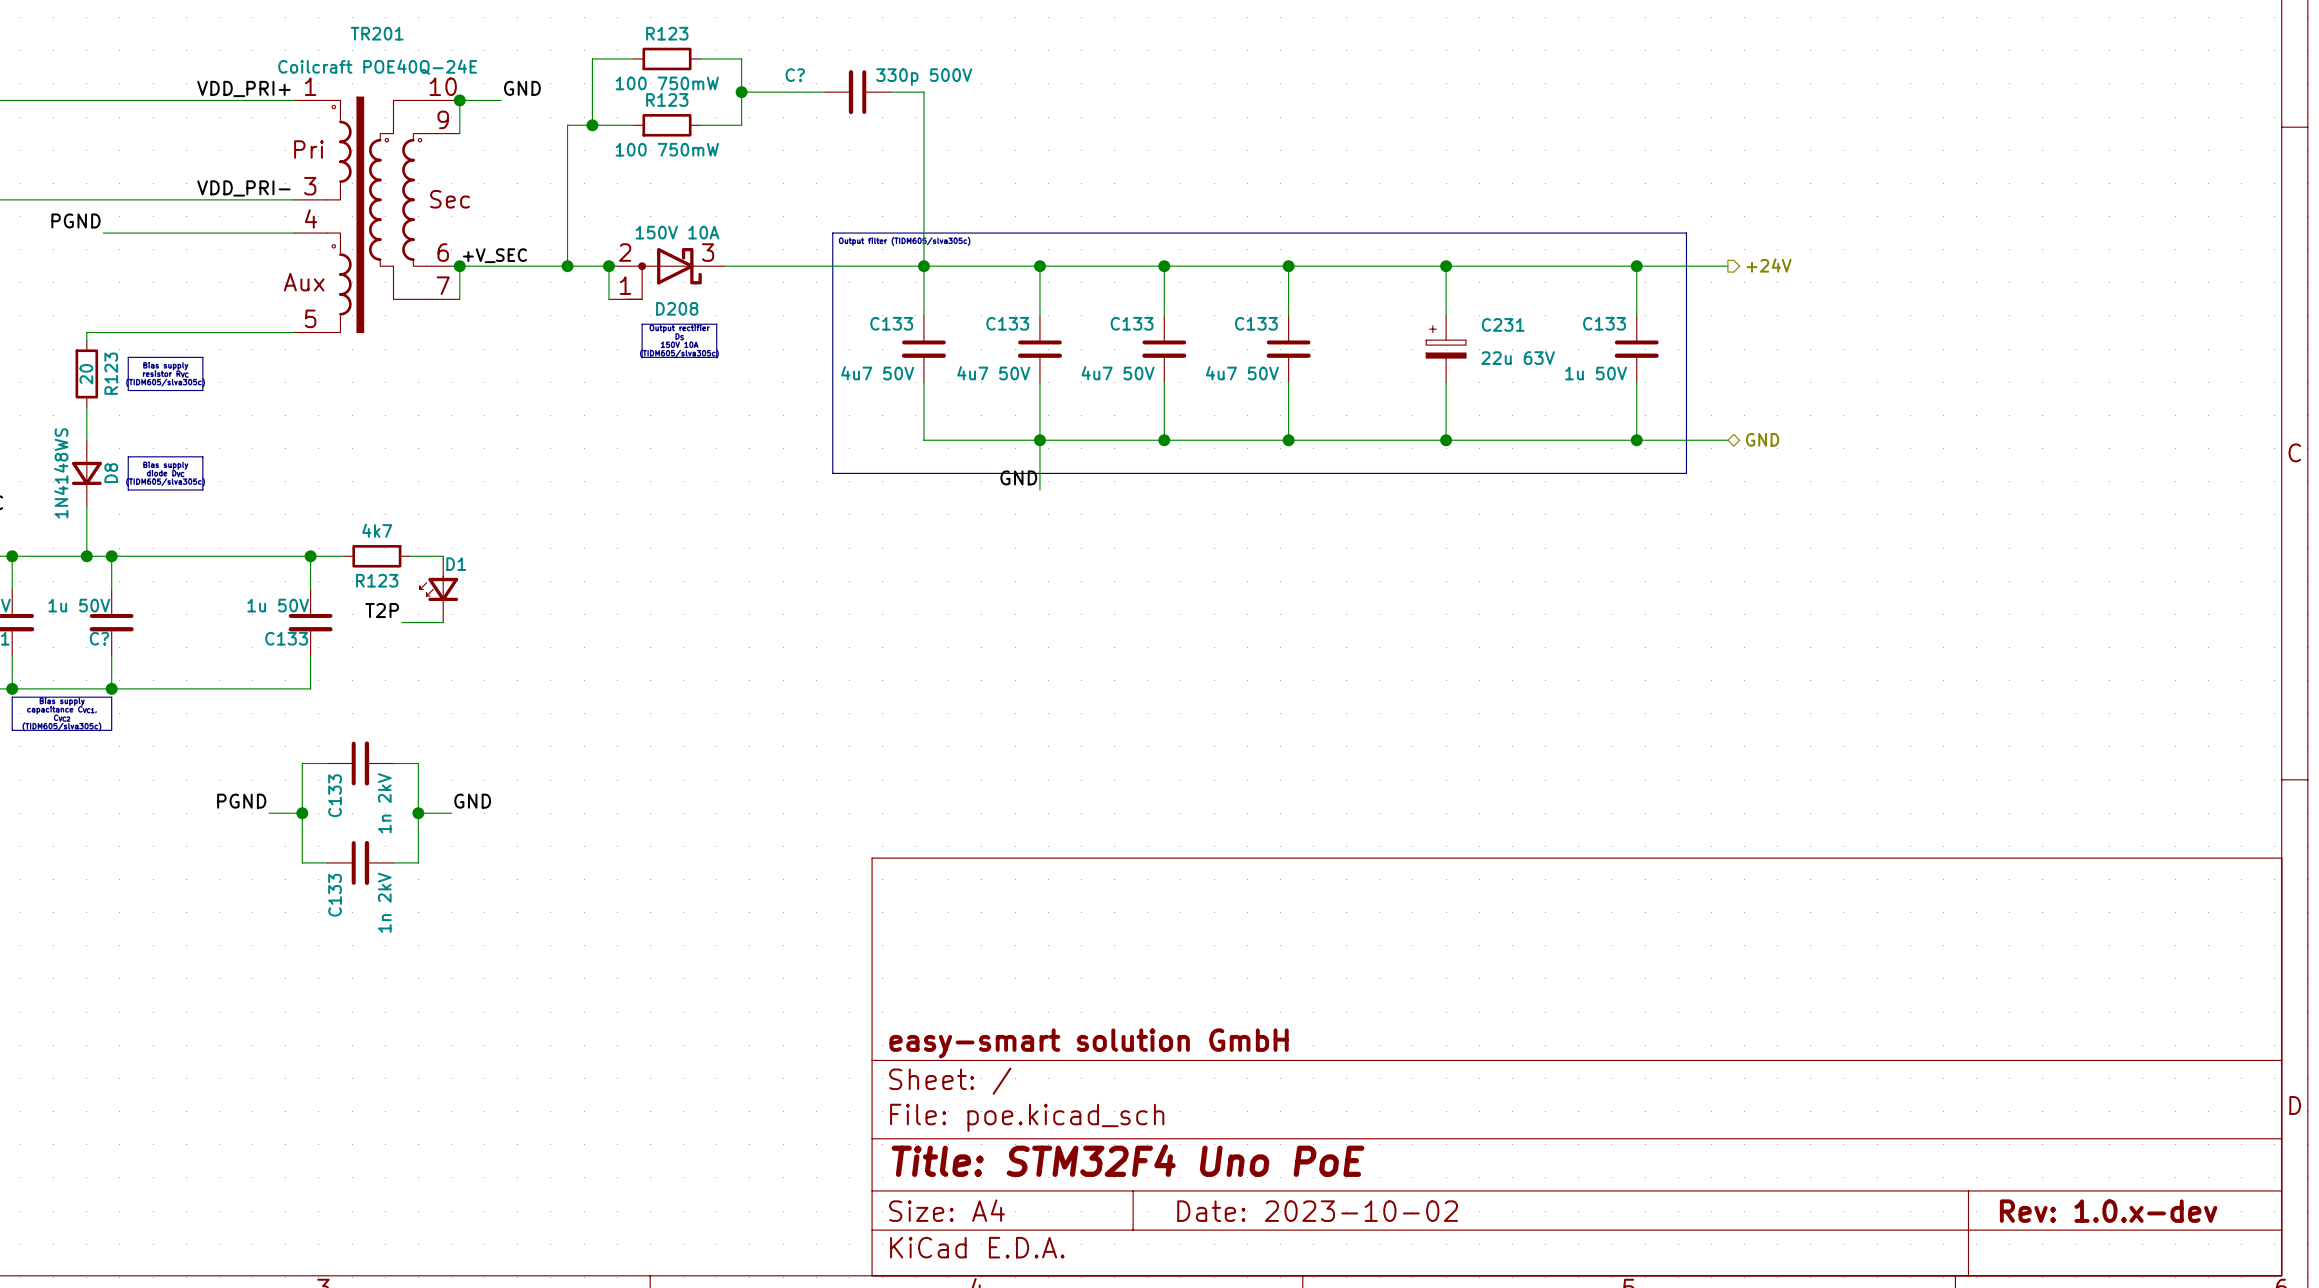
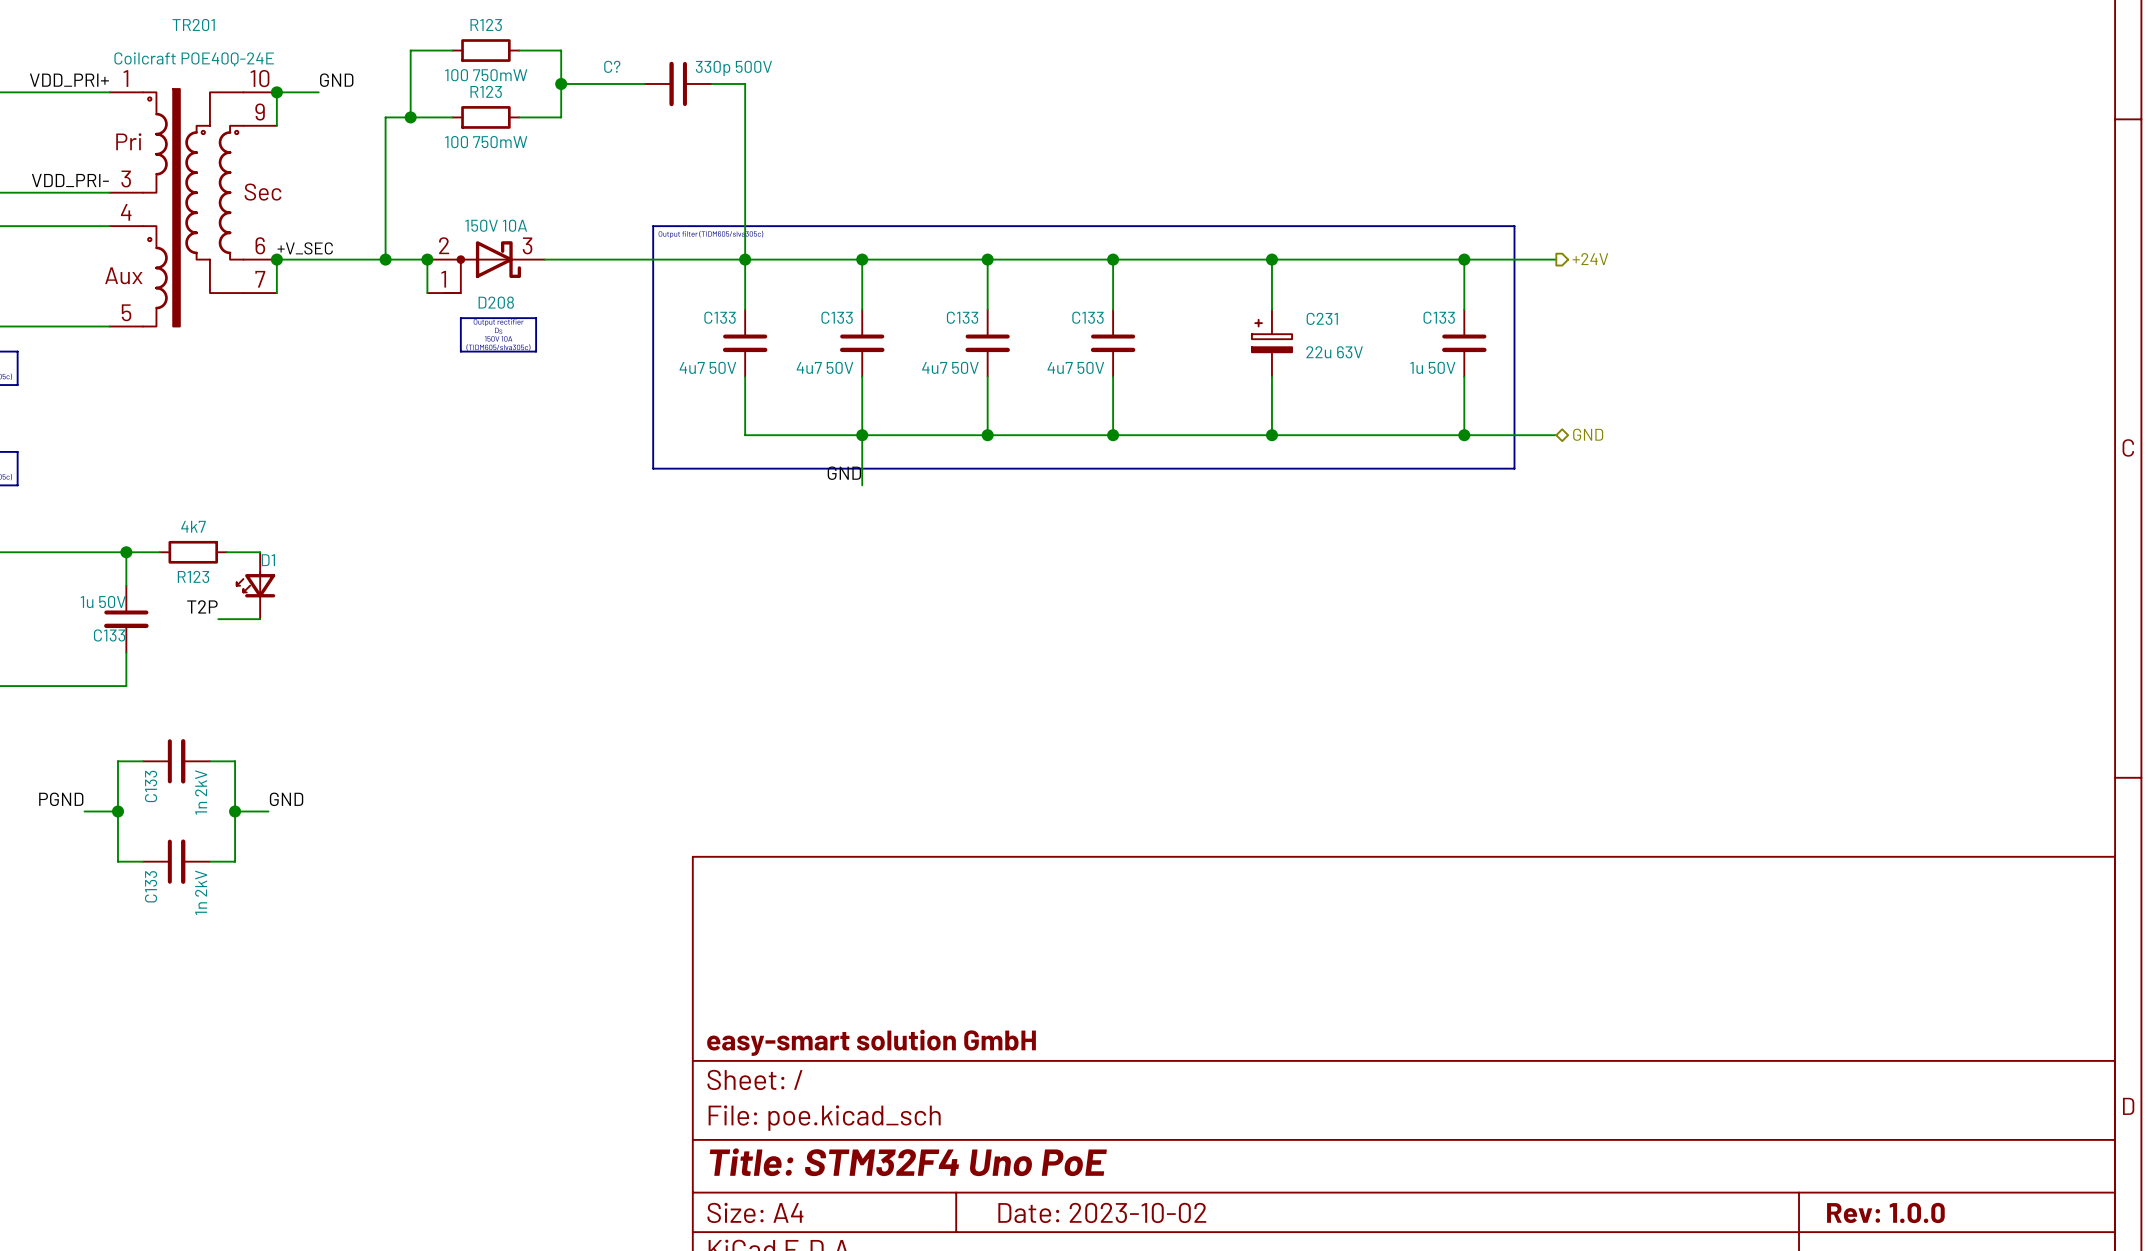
title block: Rev: 1.0.x-dev (2108, 1211) -> Rev: 1.0.0 (1885, 1212)

